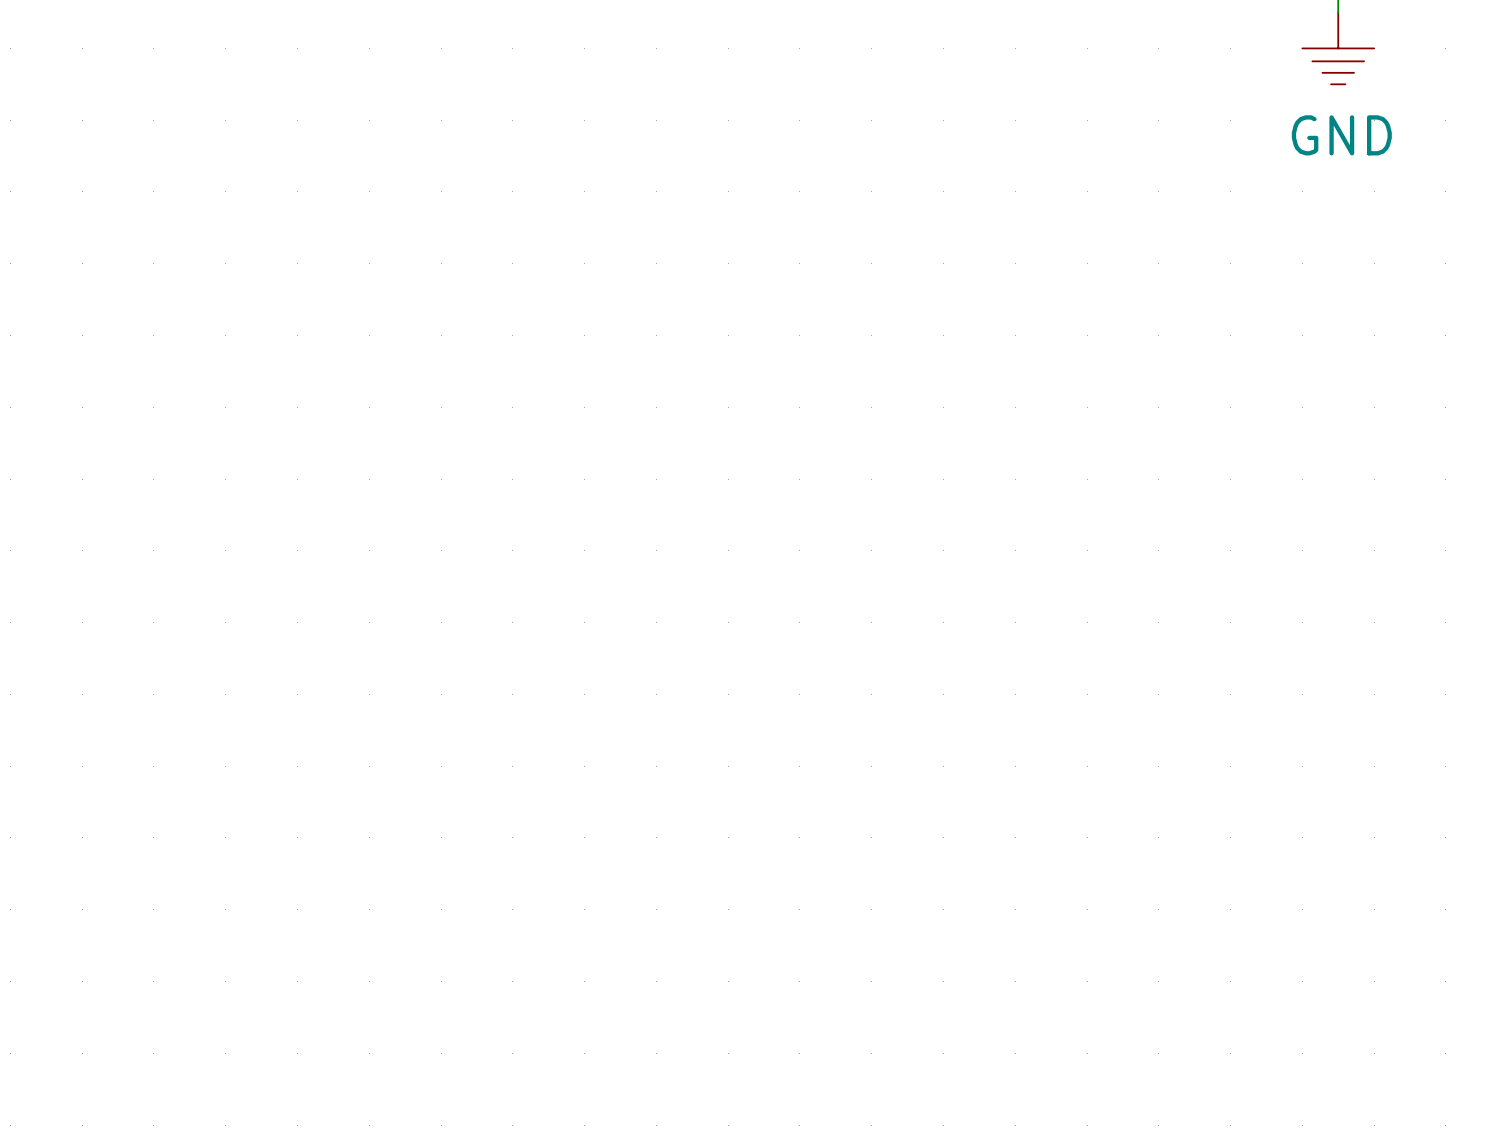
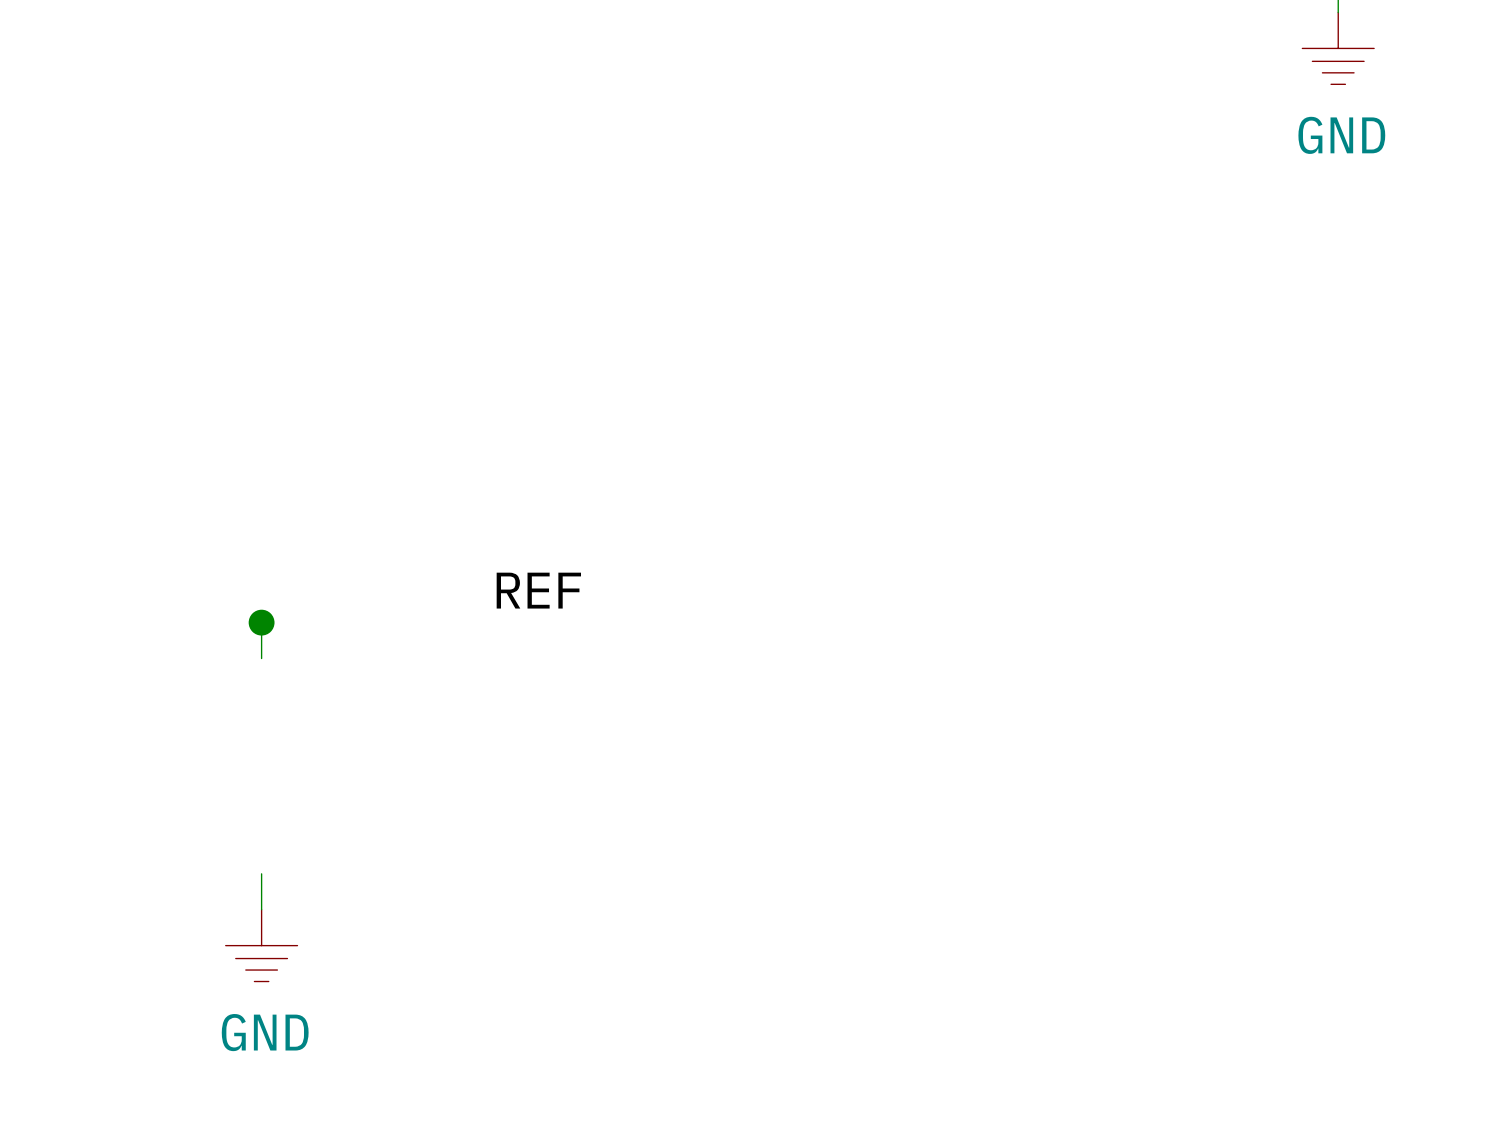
label: none -> REF (538, 590)
wire: none -> (261, 622) (261, 658)
junction: none -> (261, 622)
wire: none -> (261, 873) (261, 909)
power symbol: none -> GND (261, 945)

